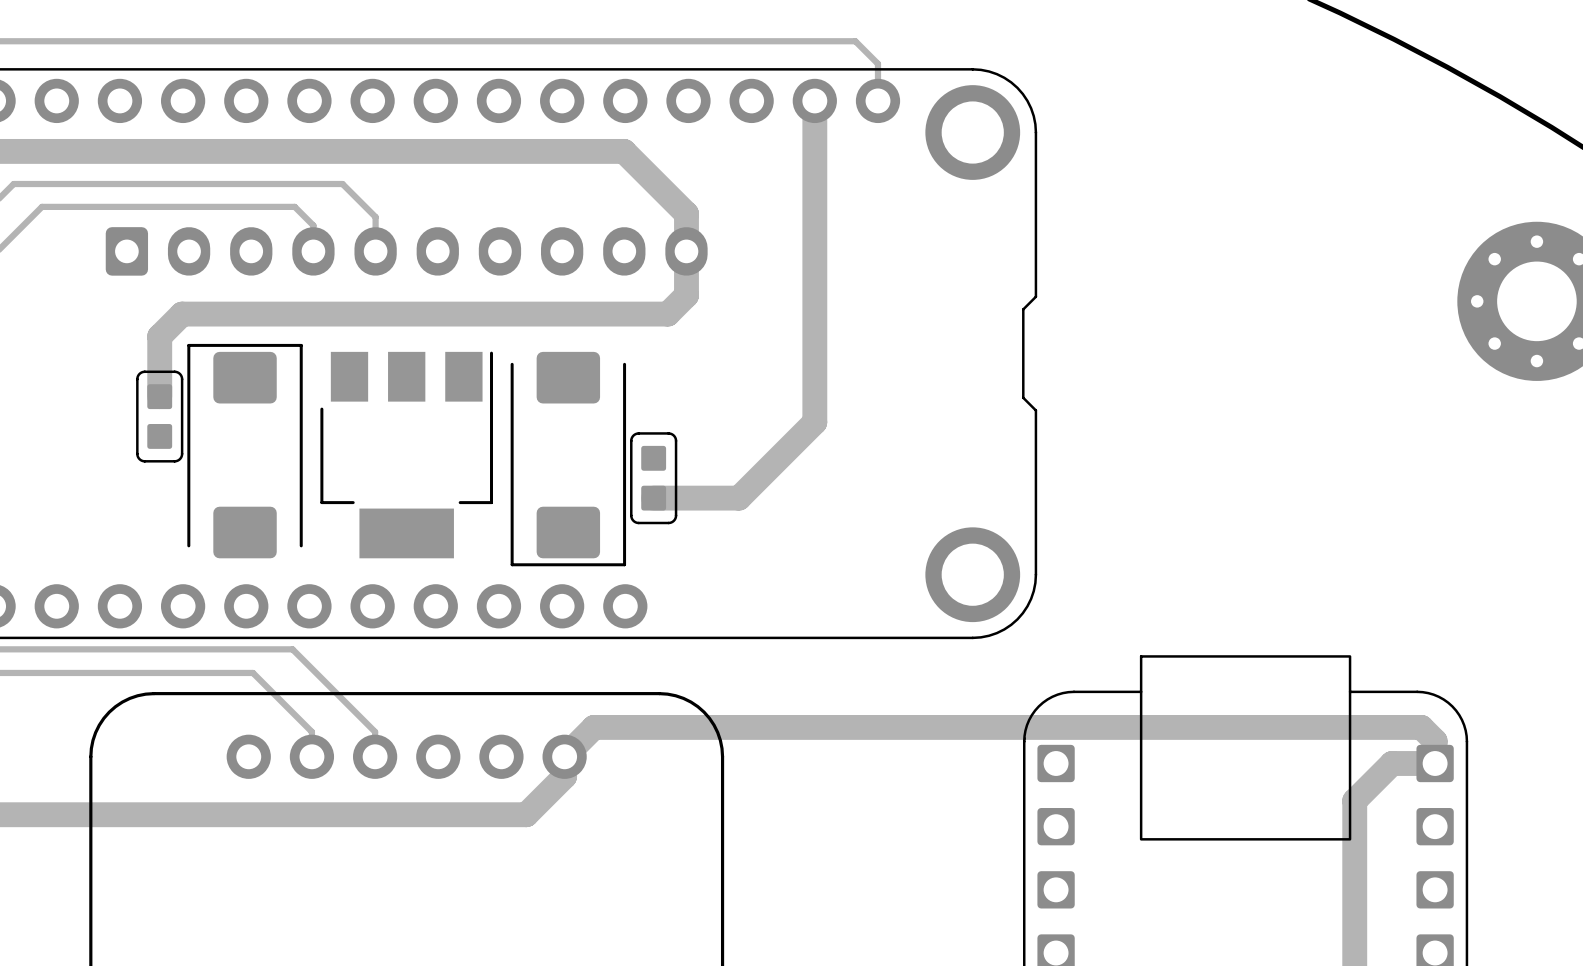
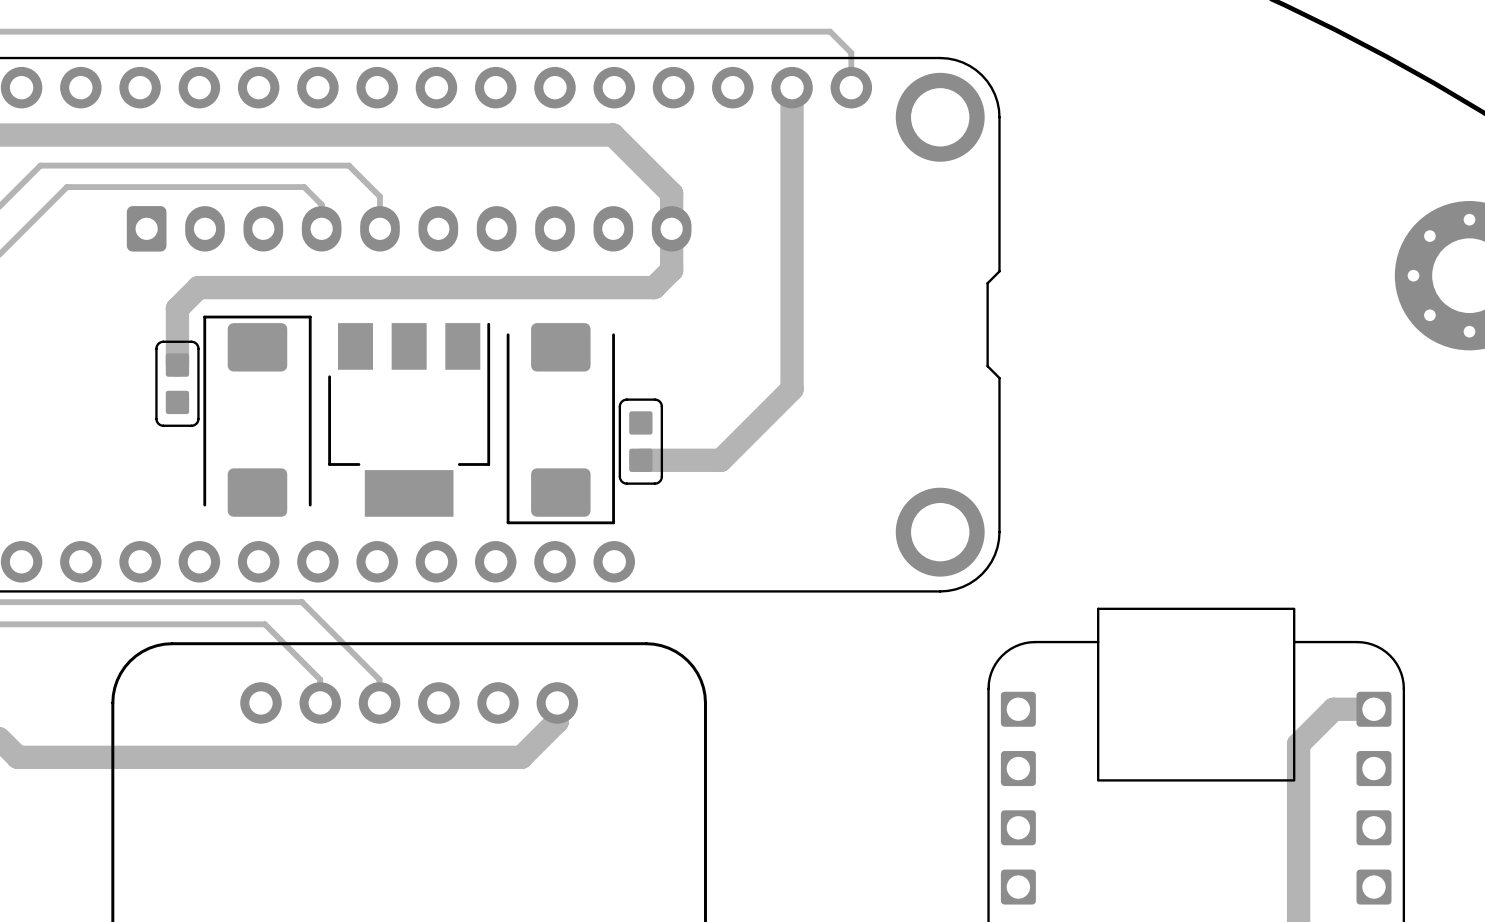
track: (564, 756) (593, 727) (1421, 727) (1435, 741) (1435, 763) -> none

